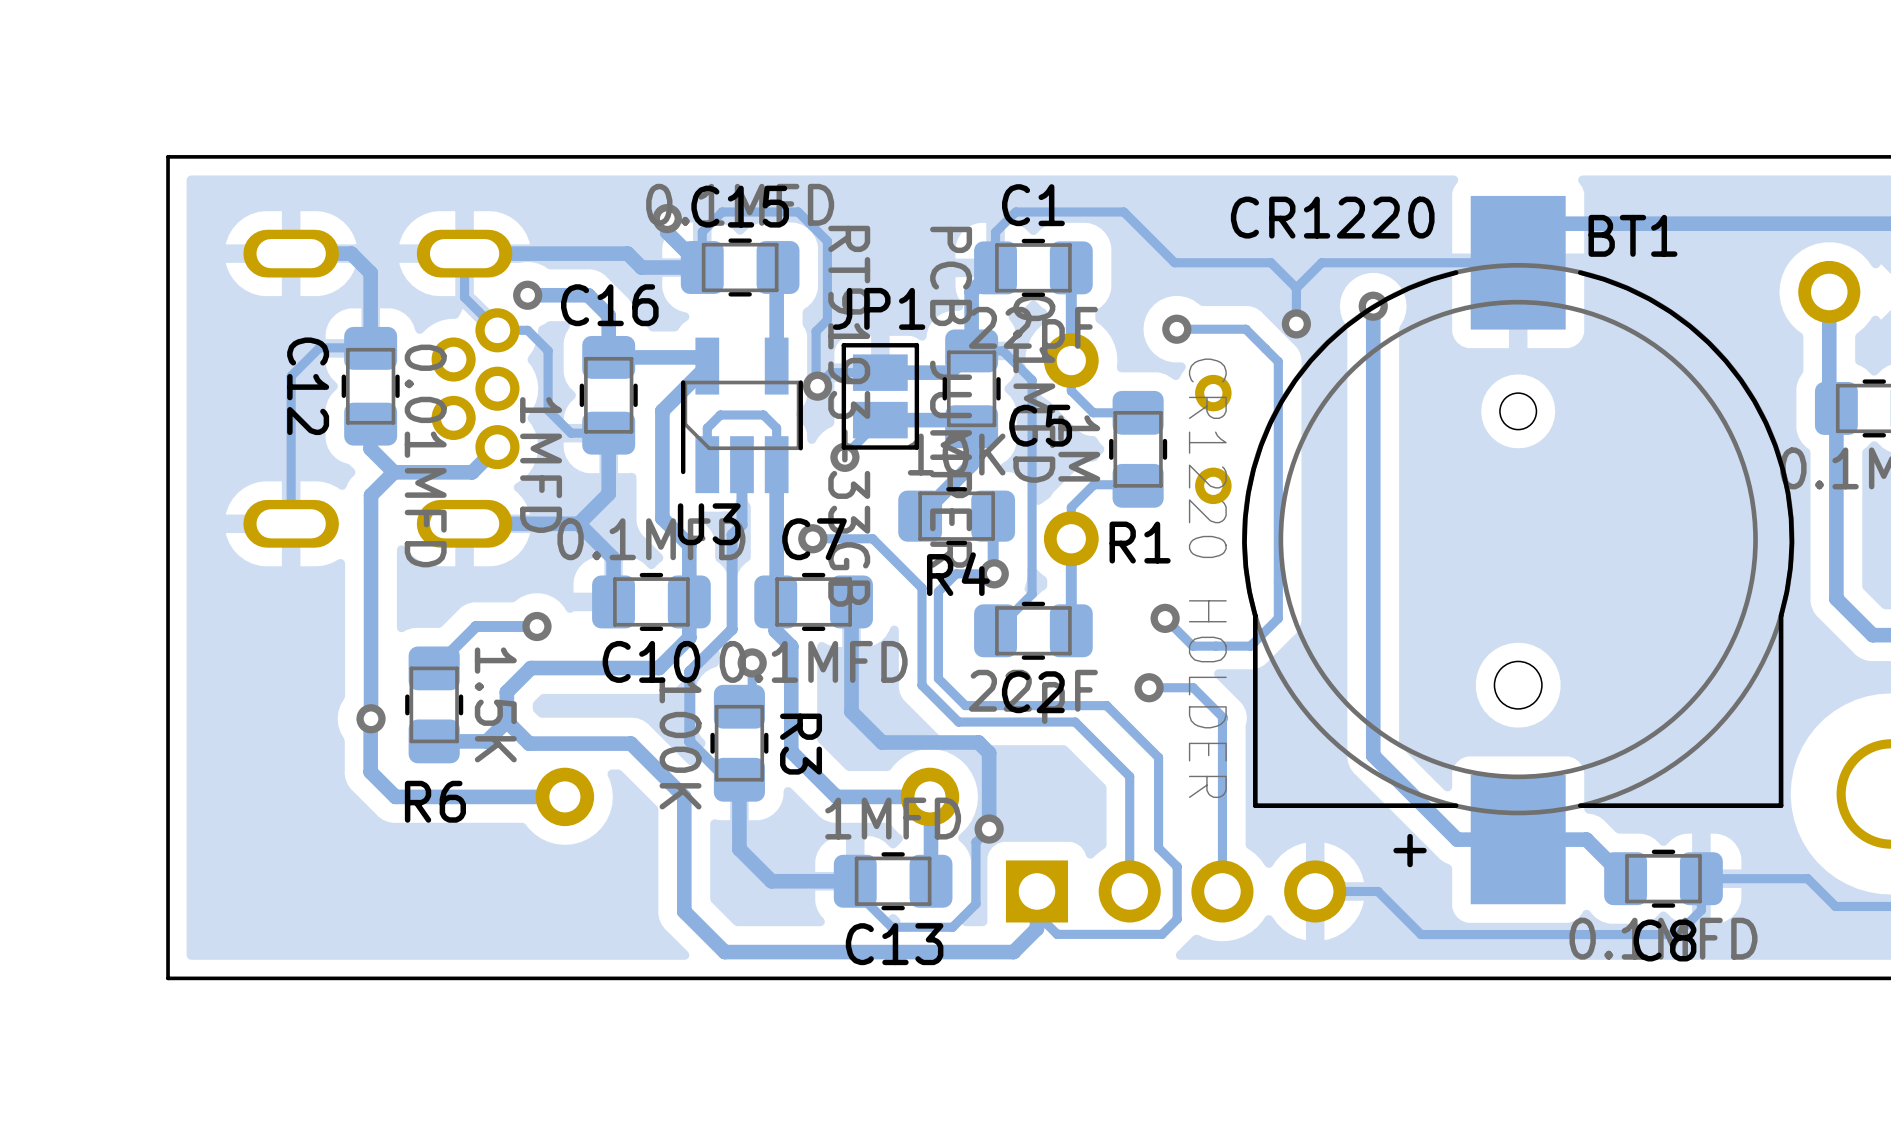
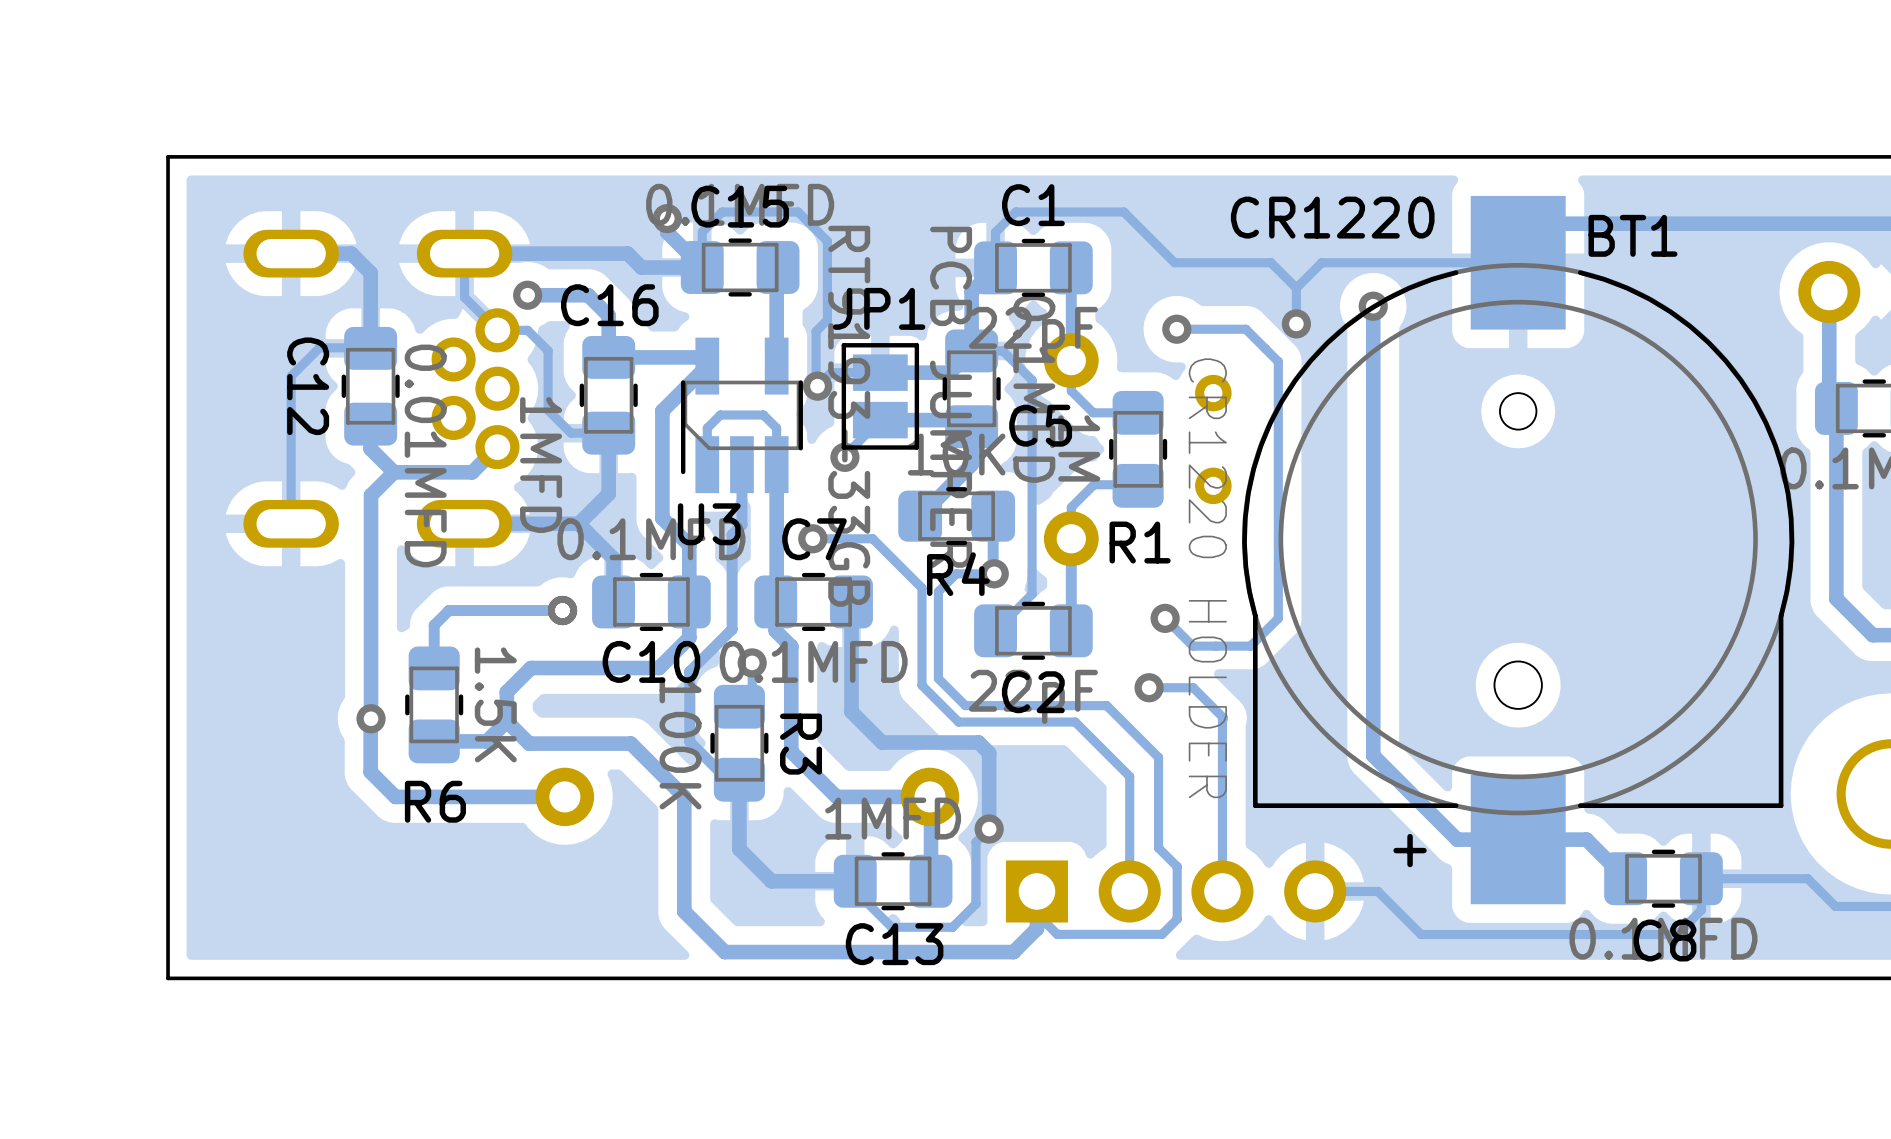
track: (533, 623) (536, 626) (476, 626) (434, 668) -> (562, 610) (448, 610) (434, 625) (434, 668)
via position: (536, 626) -> (562, 610)

